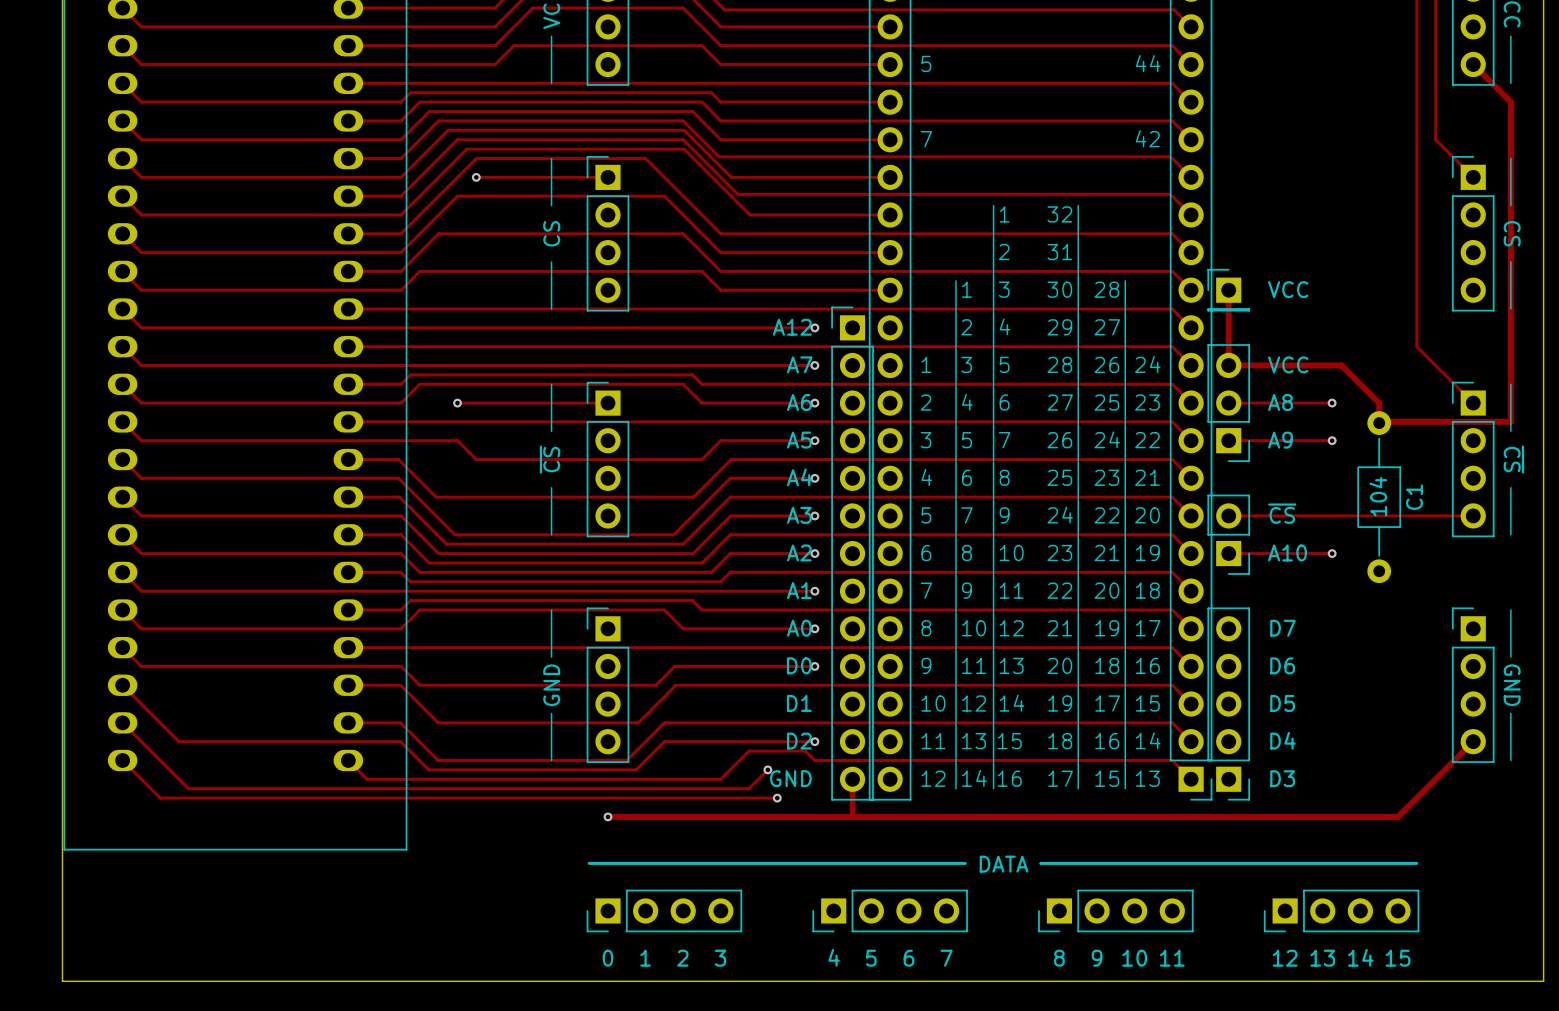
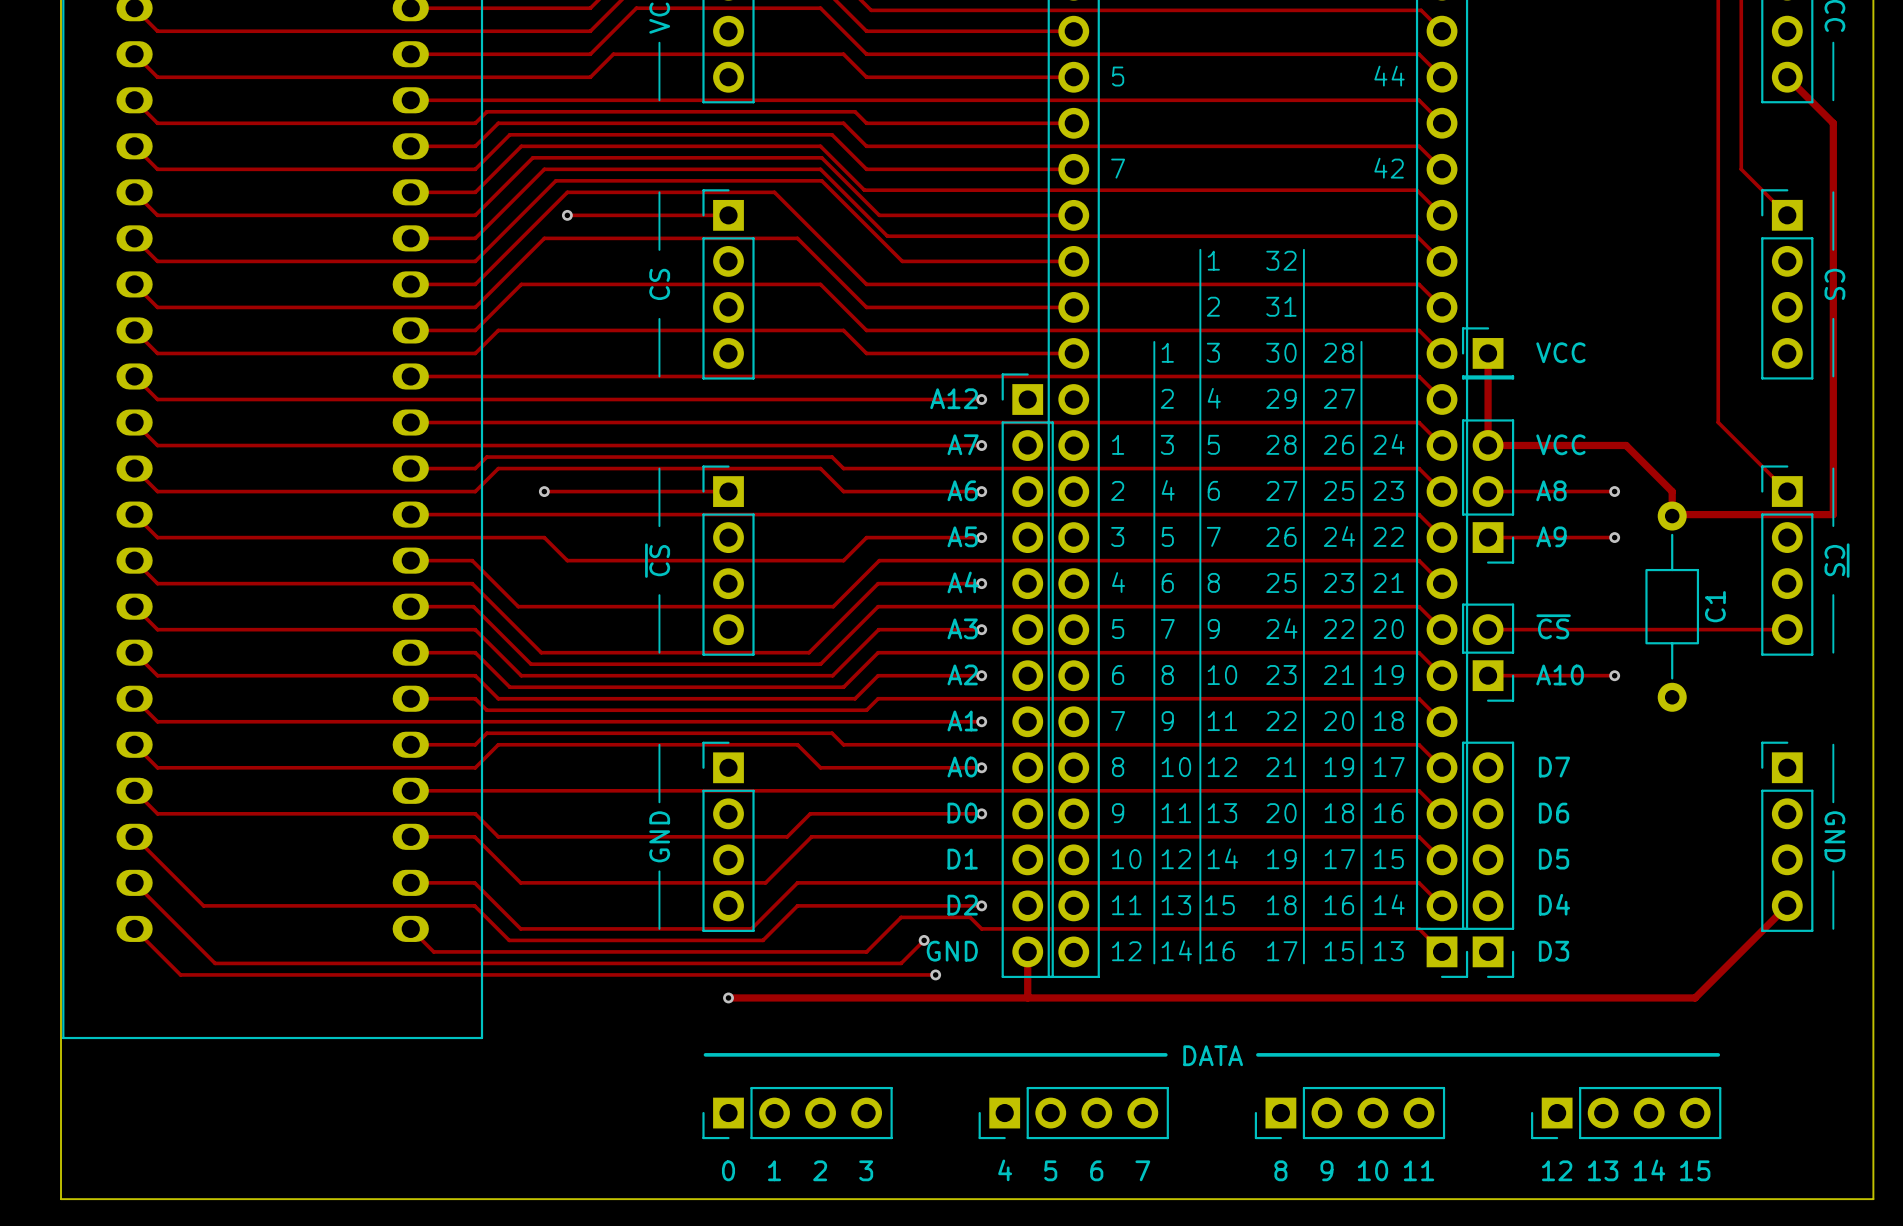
C1 value: 104 (1378, 496) -> none

